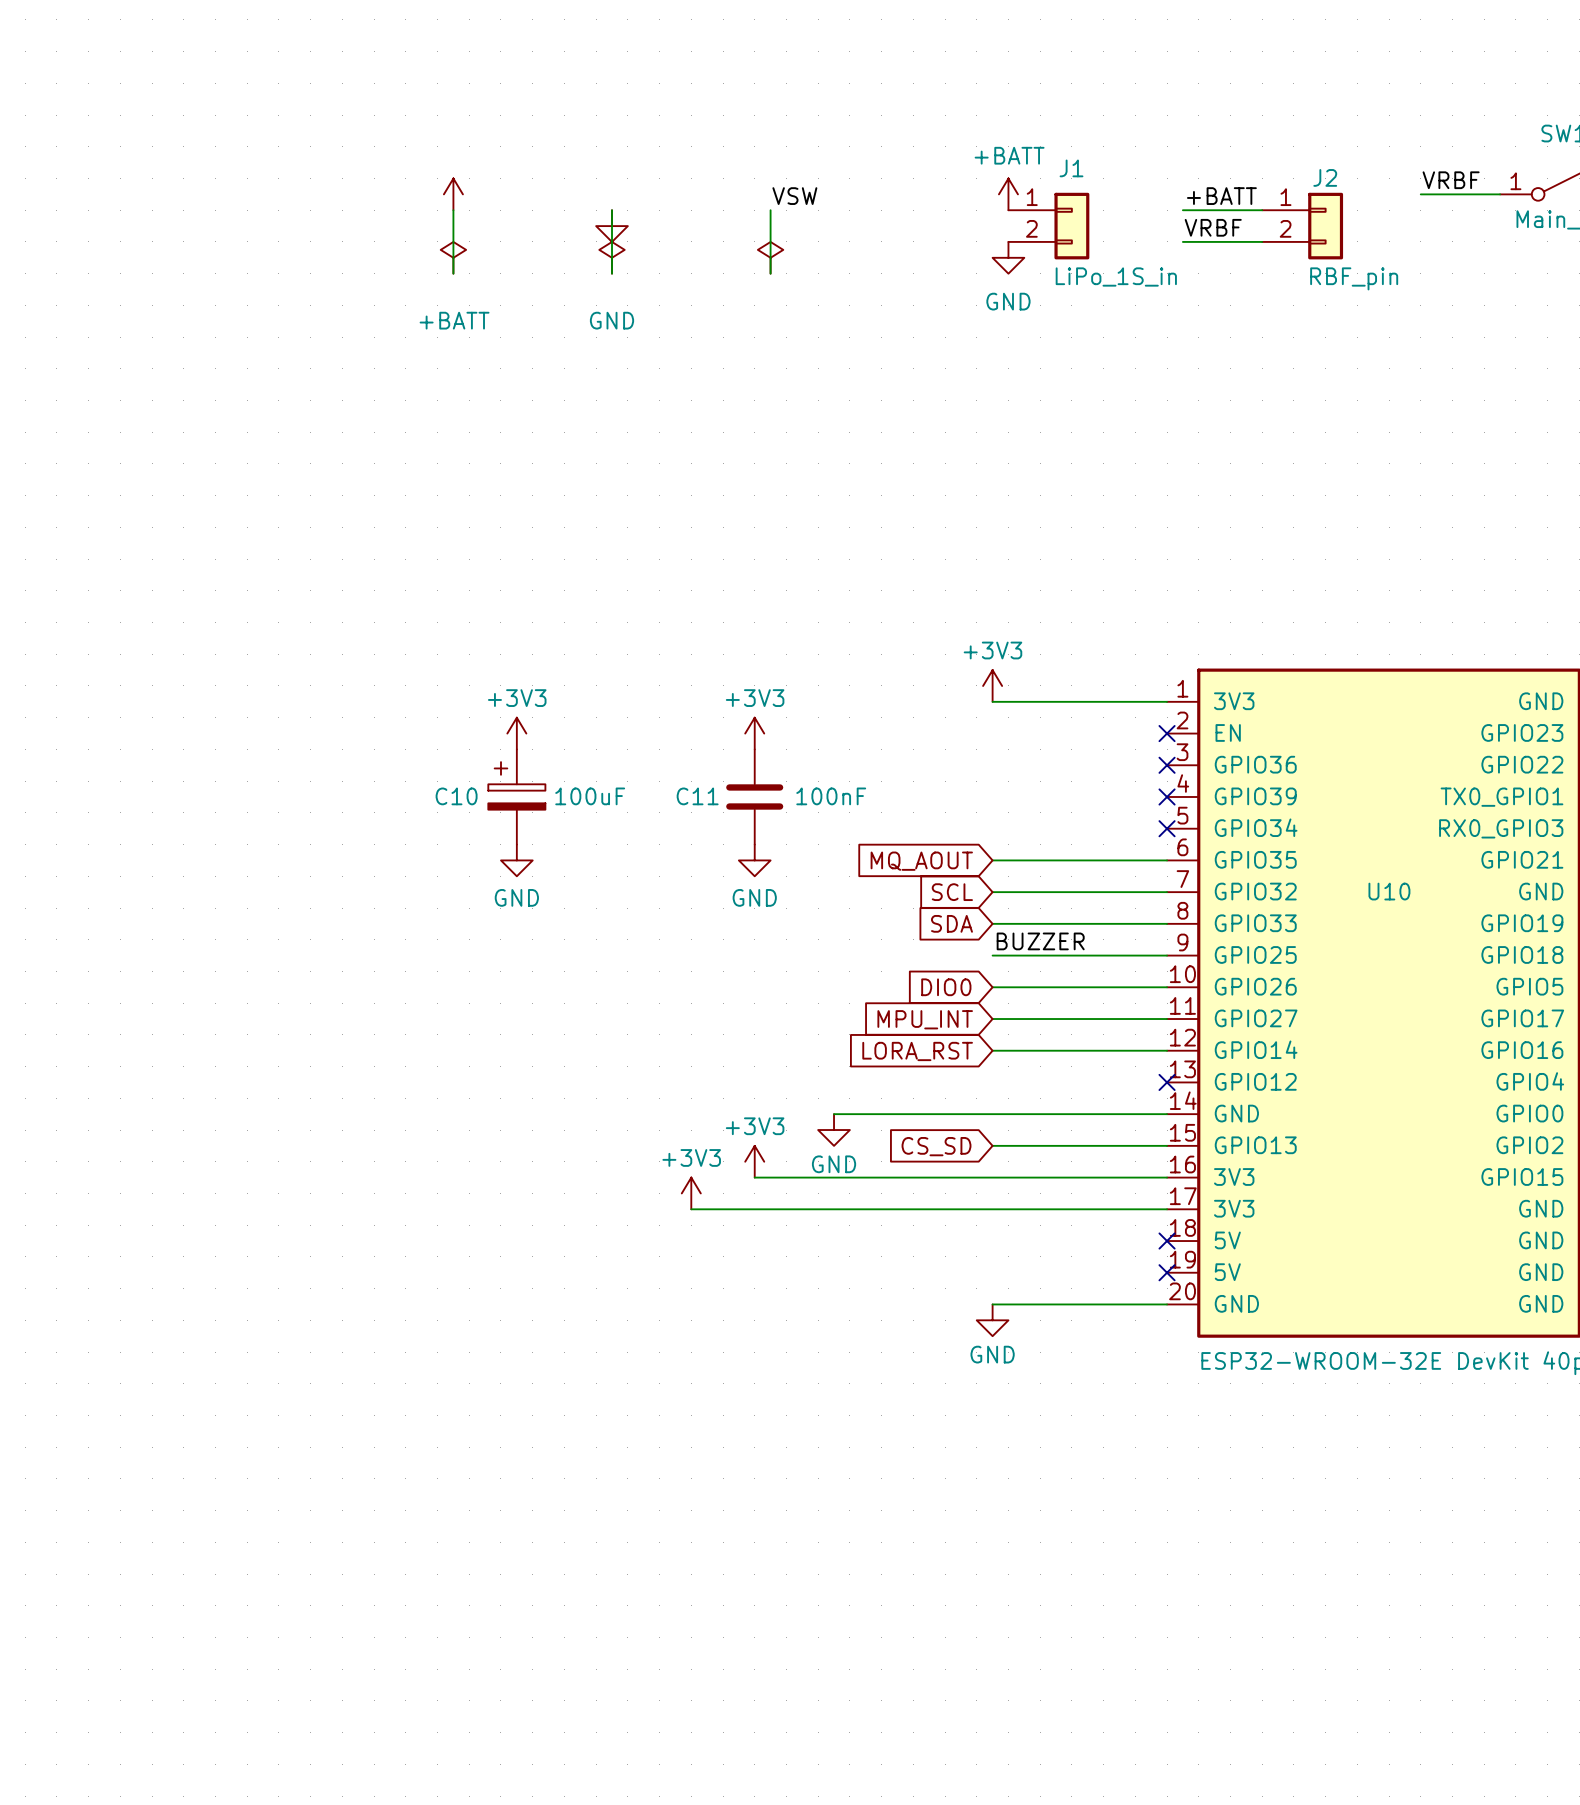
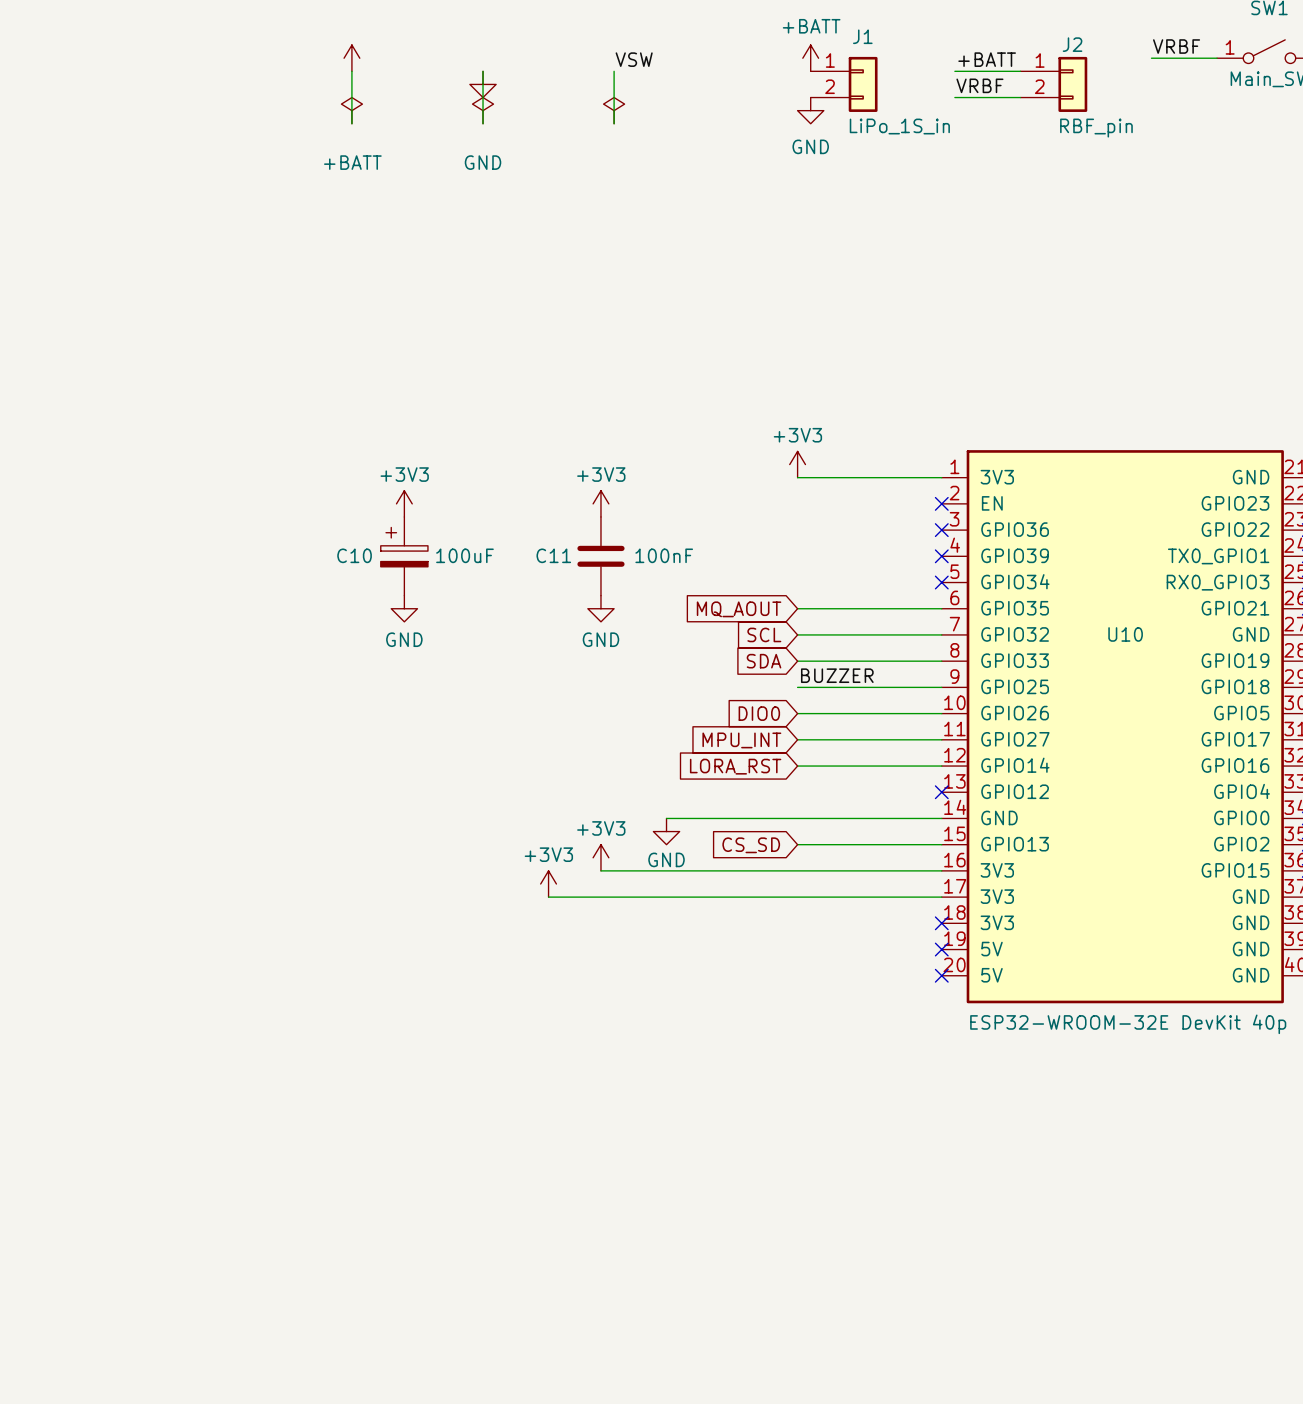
U10 pin name: 5V (1227, 1240) -> 3V3 (997, 922)
U10 pin name: GND (1236, 1303) -> 5V (991, 975)
wire: (992, 1304) (1167, 1304) -> none
no-connect mark: none -> (941, 975)
power symbol: GND (992, 1320) -> none

